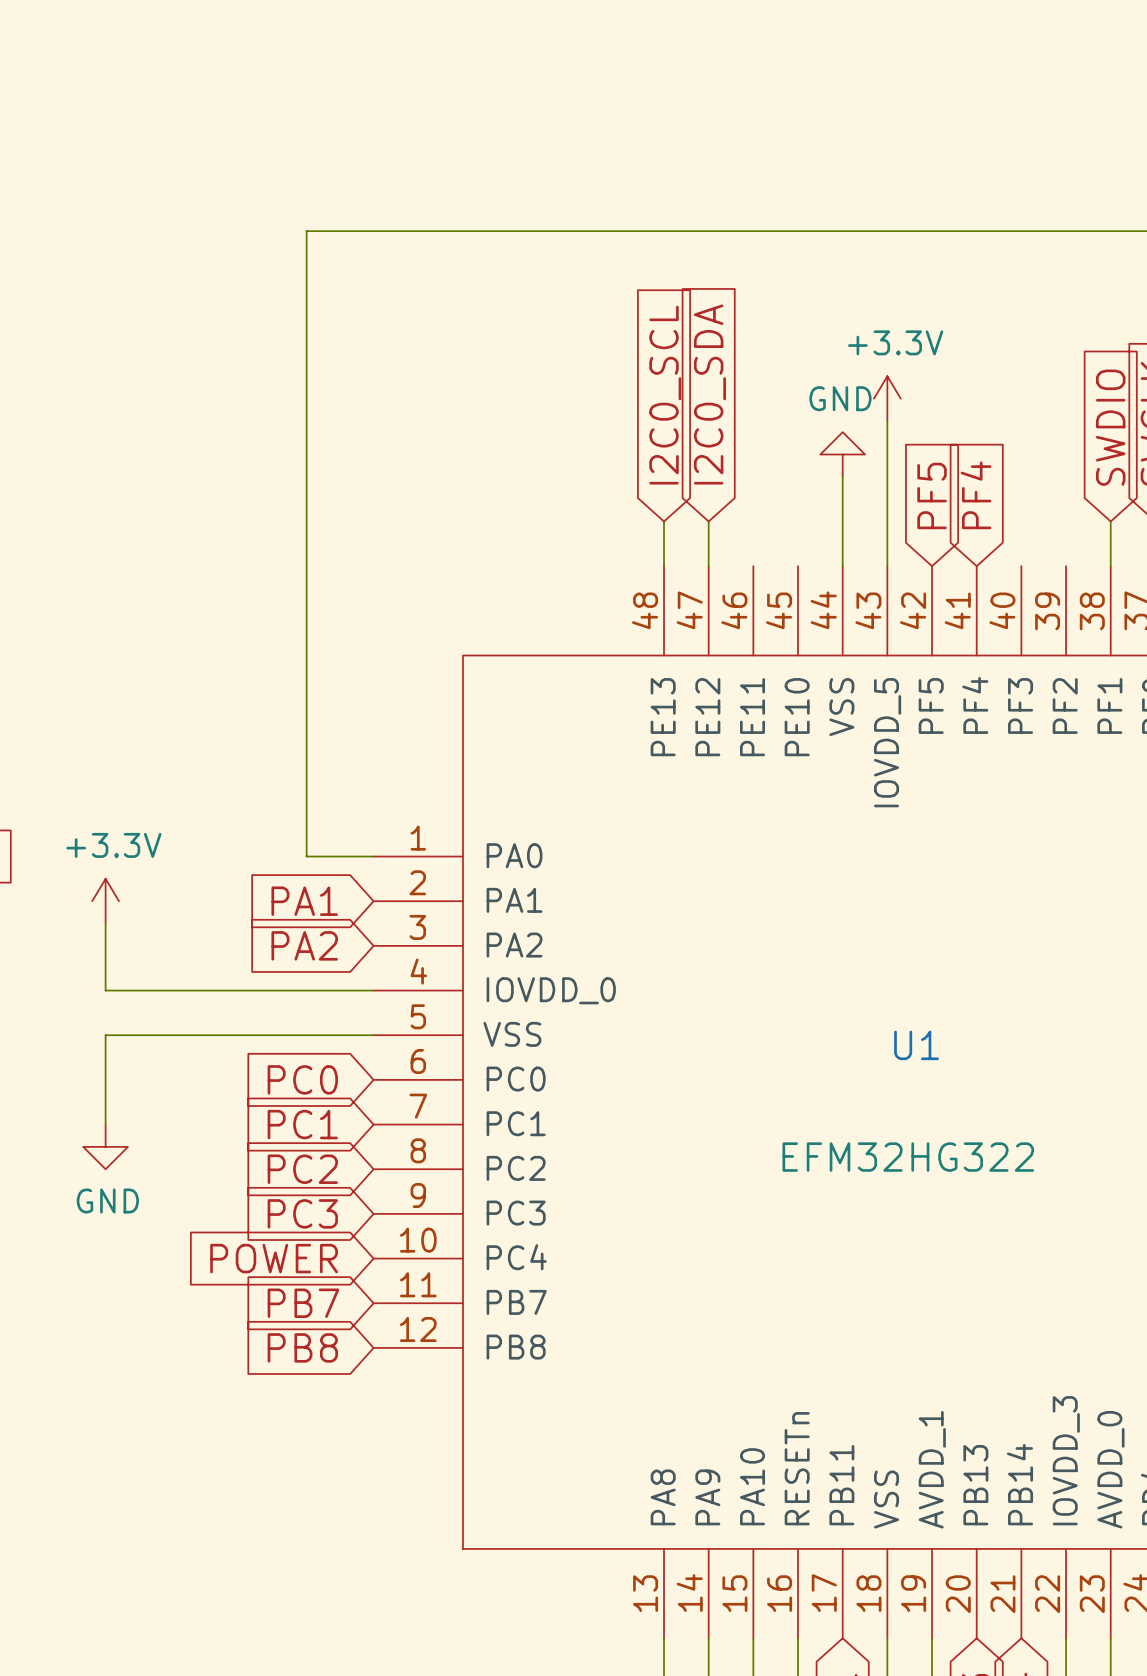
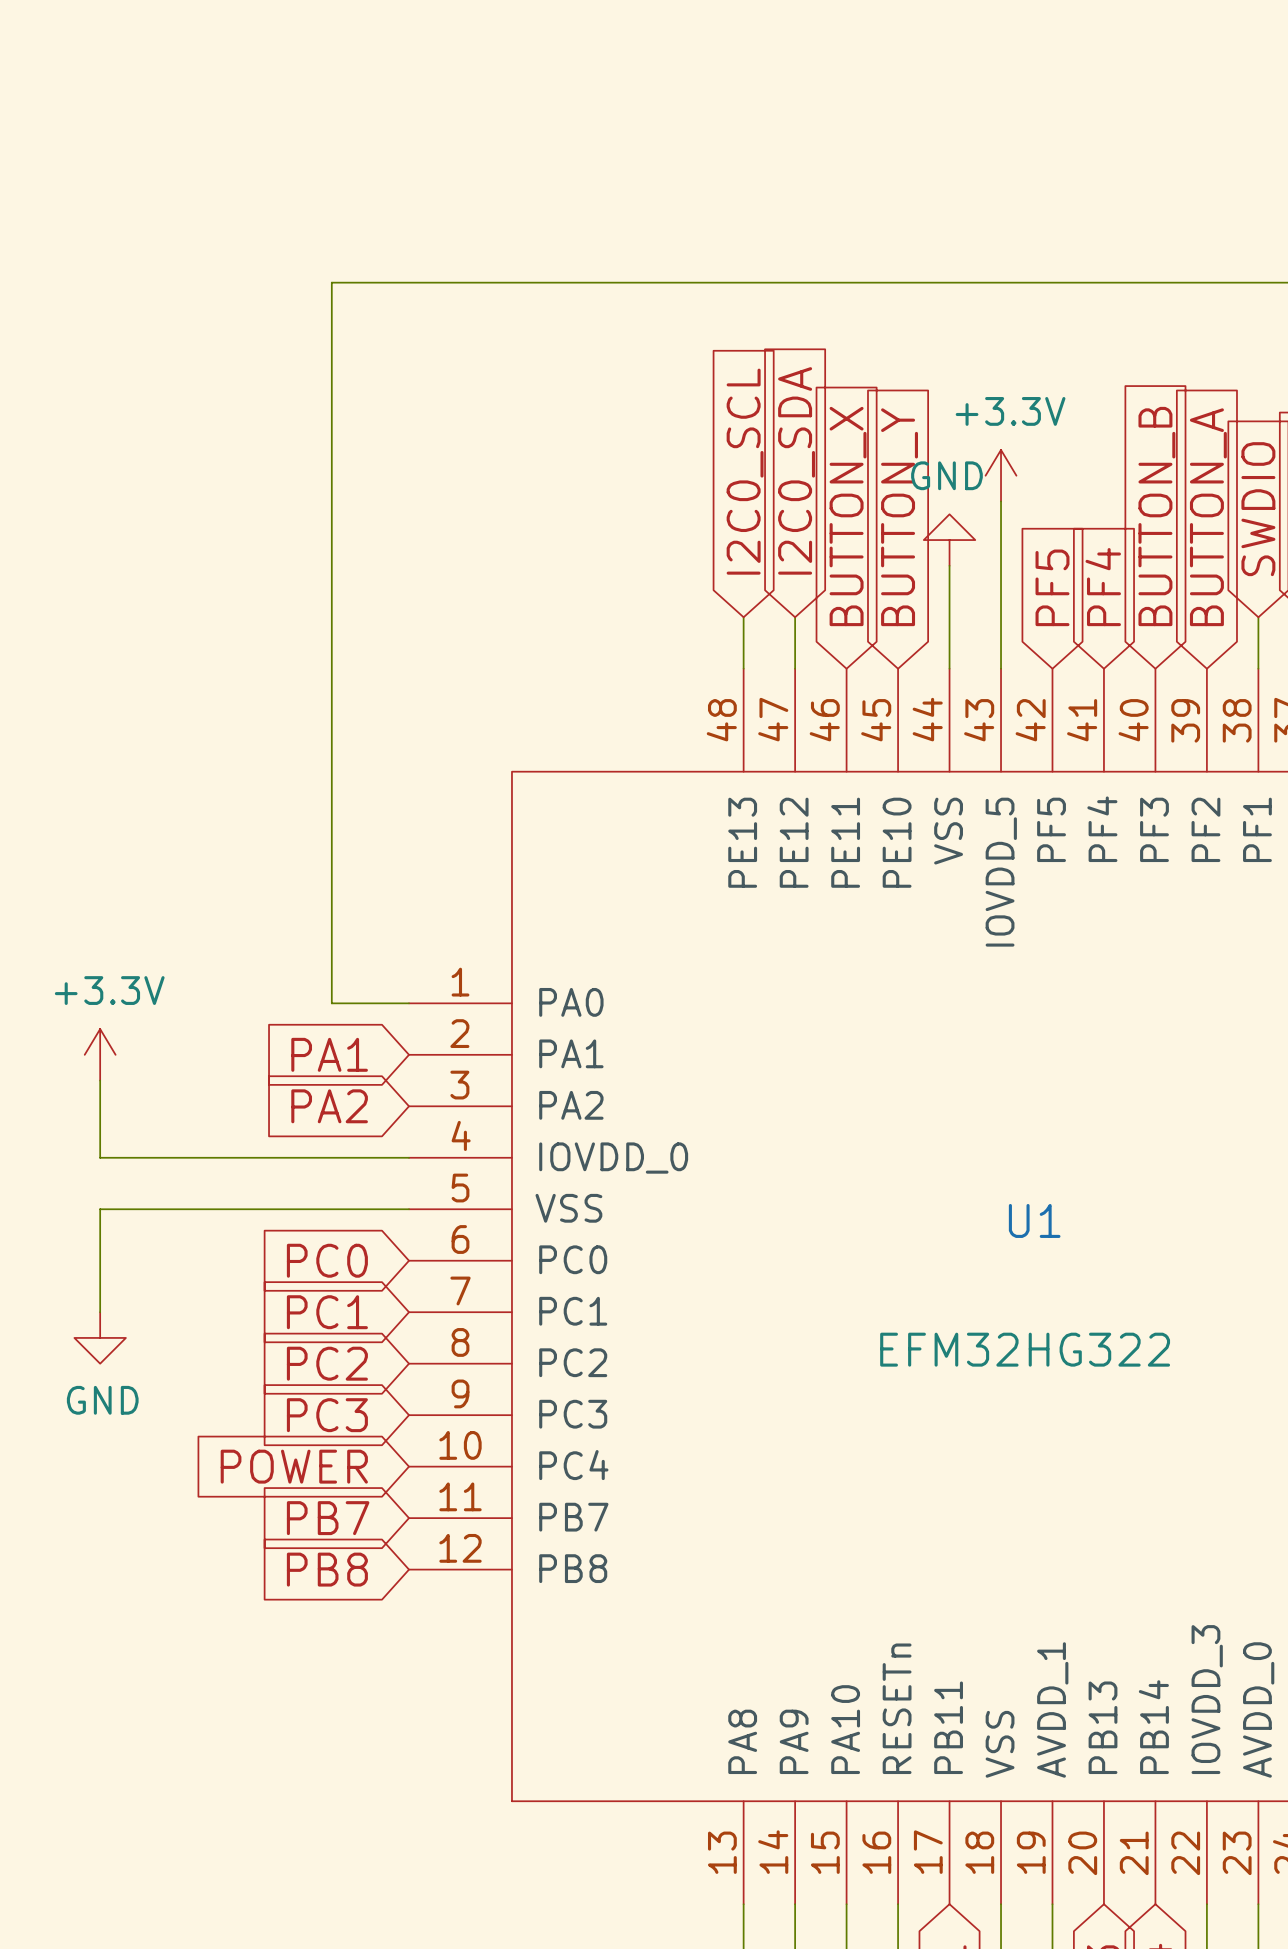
global label: none -> BUTTON_X (848, 516)
global label: none -> BUTTON_Y (899, 517)
global label: none -> BUTTON_B (1156, 516)
global label: none -> BUTTON_A (1208, 517)

